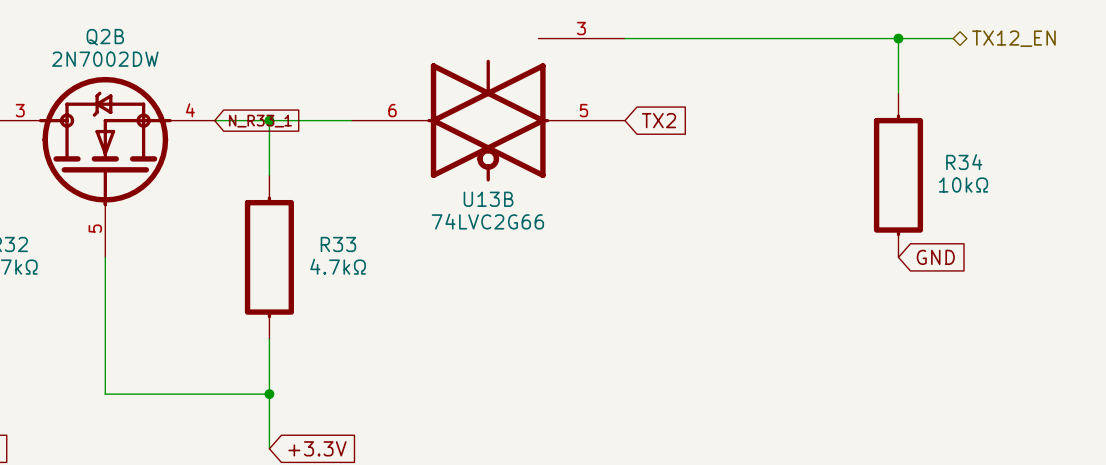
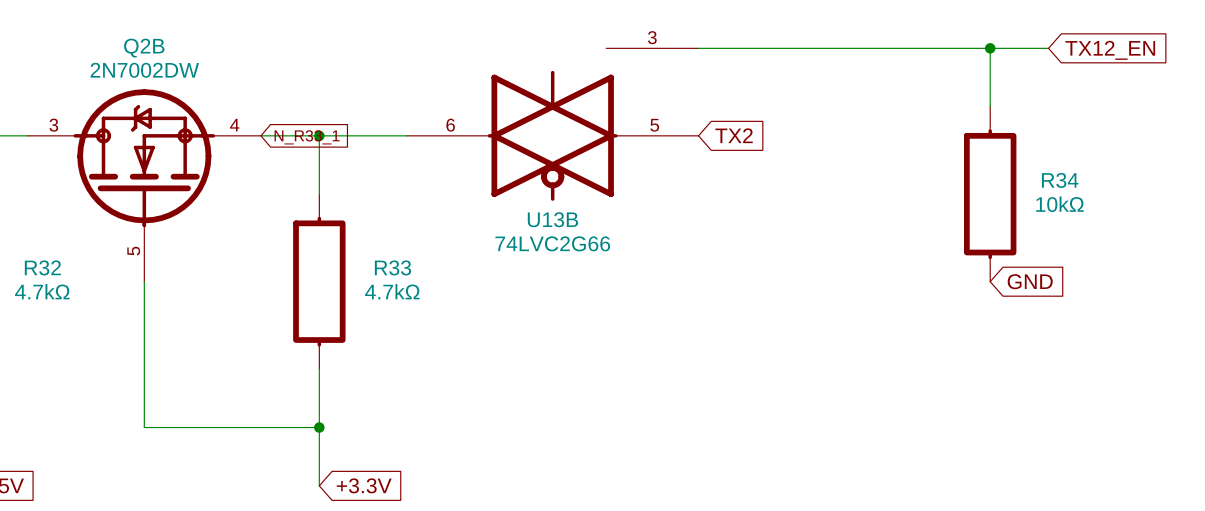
hierarchical label: TX12_EN (1013, 38) -> none
global label: none -> TX12_EN (1110, 50)

